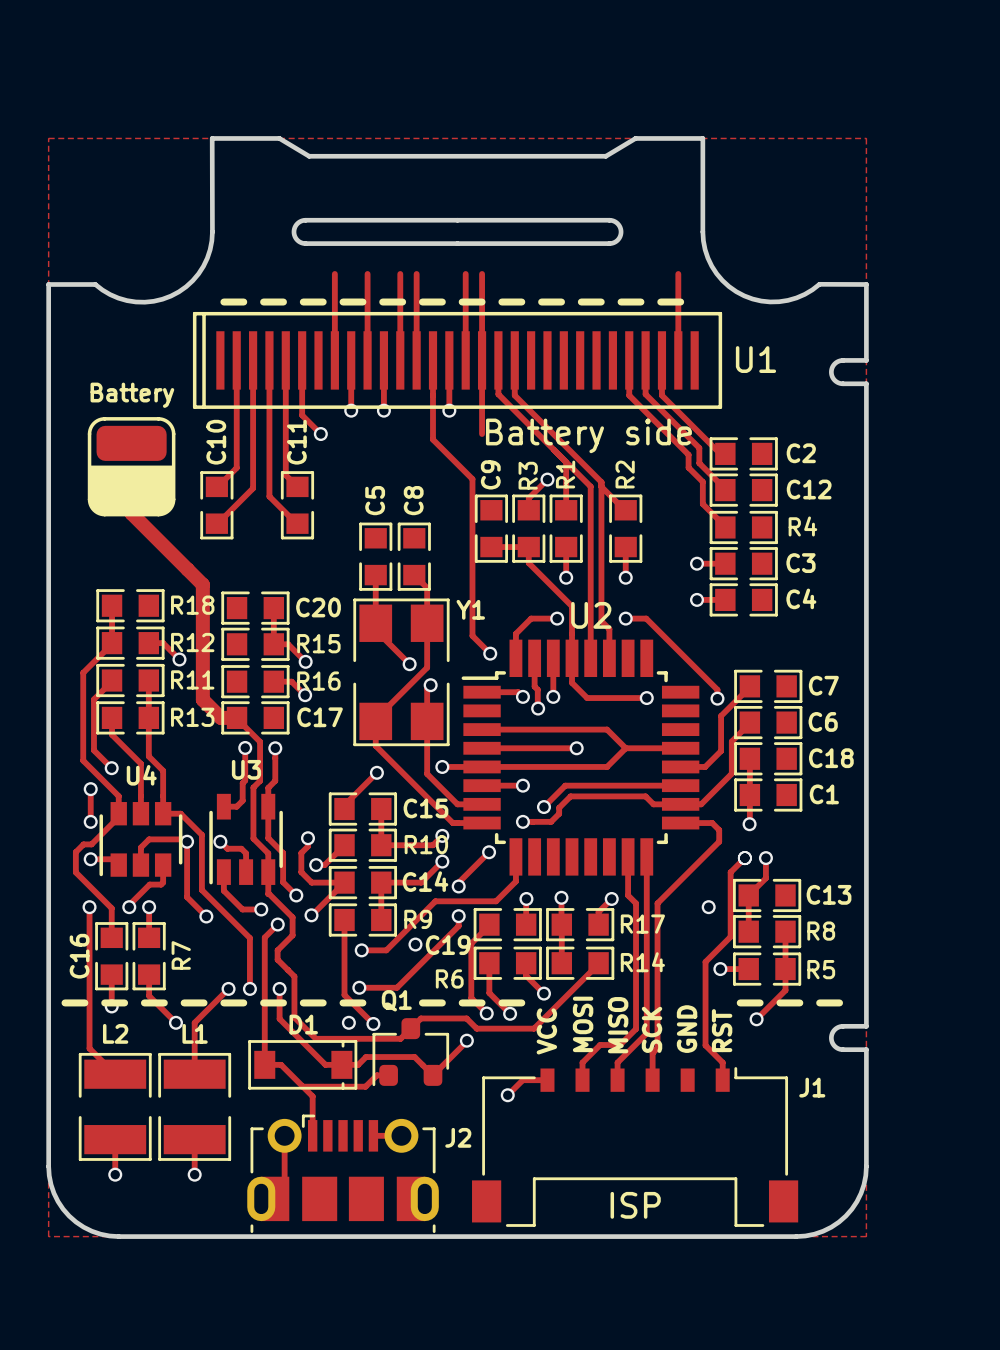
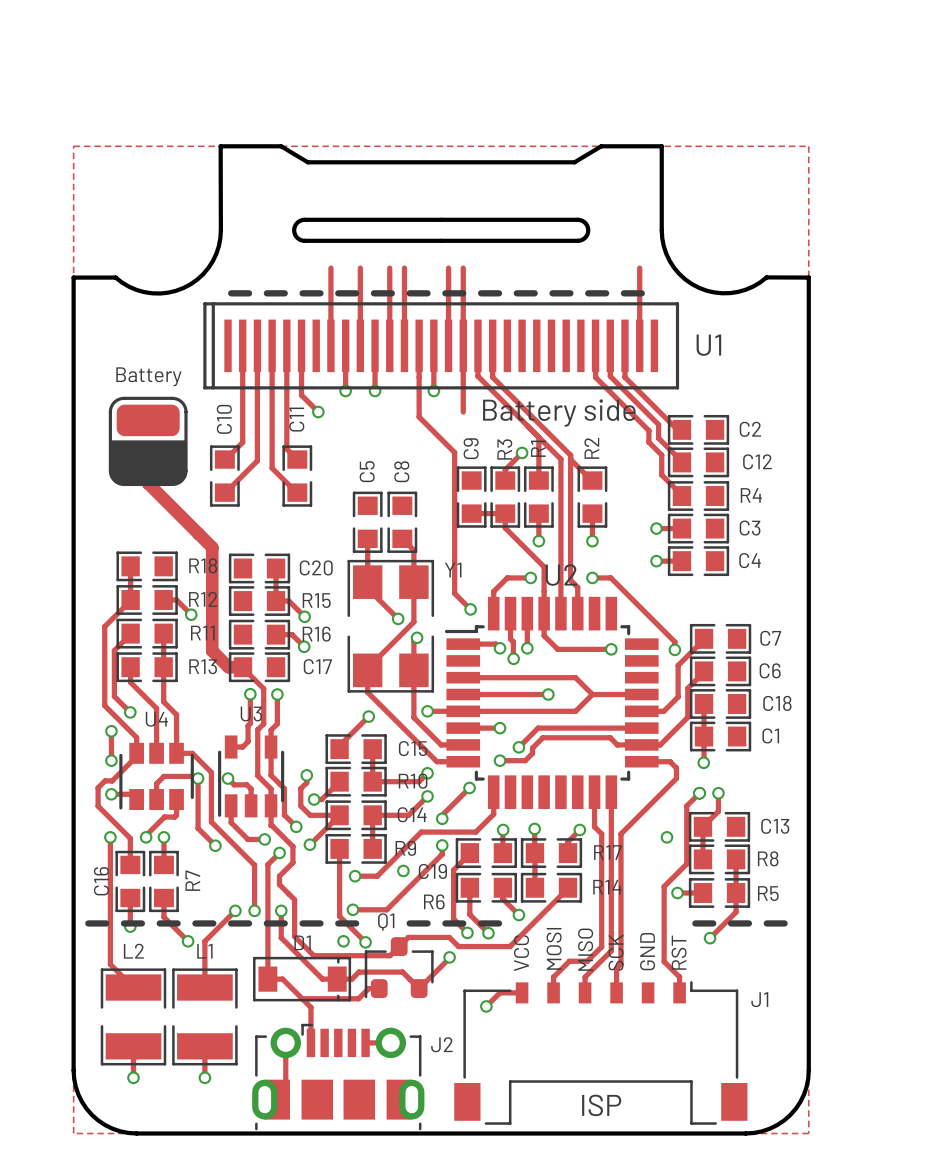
board edge: (866, 360) (840, 360) (833, 365) (831, 372) (833, 379) (840, 383) (866, 383) -> (808, 345) (808, 366)
board edge: (866, 1026) (840, 1026) (833, 1030) (831, 1037) (833, 1045) (840, 1049) (866, 1049) -> (808, 944) (808, 965)

